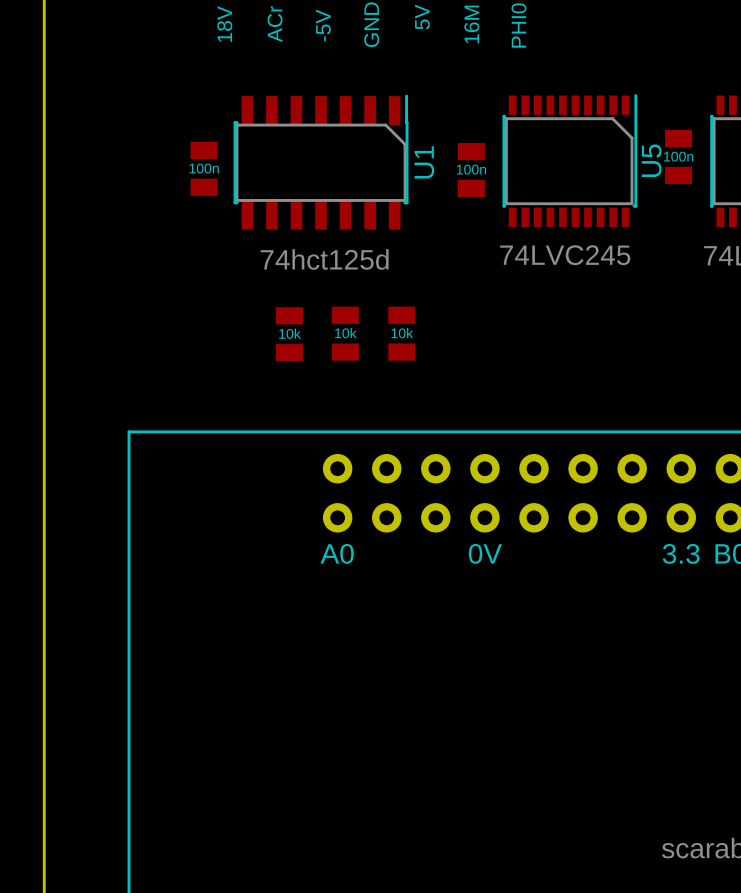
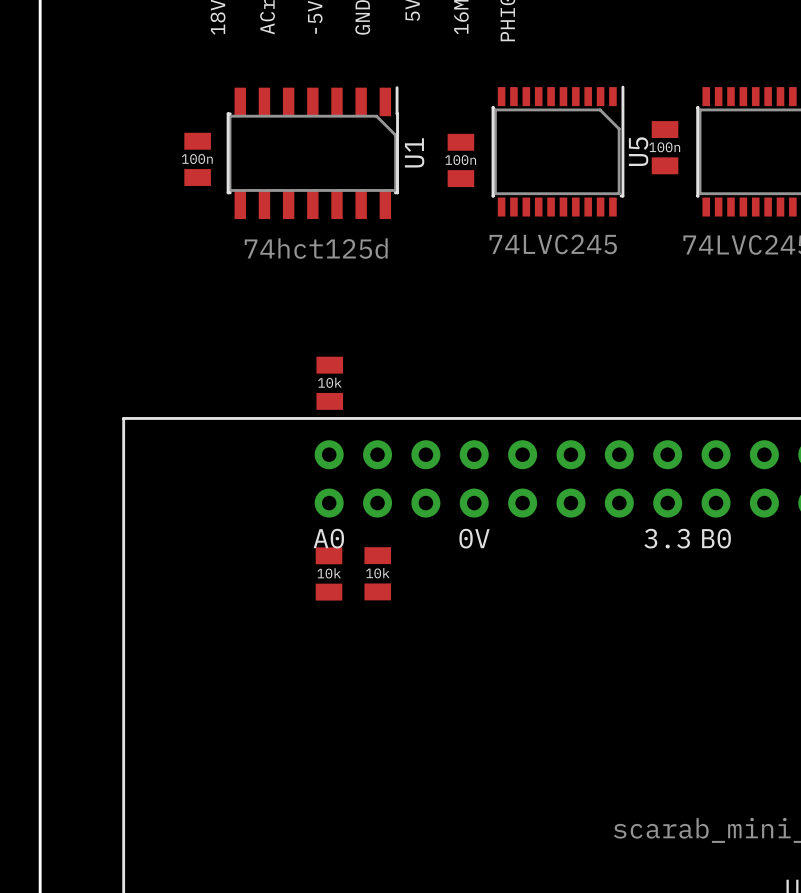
part: 10k (345, 333) -> none
part: 10k (401, 333) -> none
part: 10k (289, 334) -> none
part: none -> 10k (329, 383)
part: none -> 10k (328, 573)
part: none -> 10k (377, 573)

